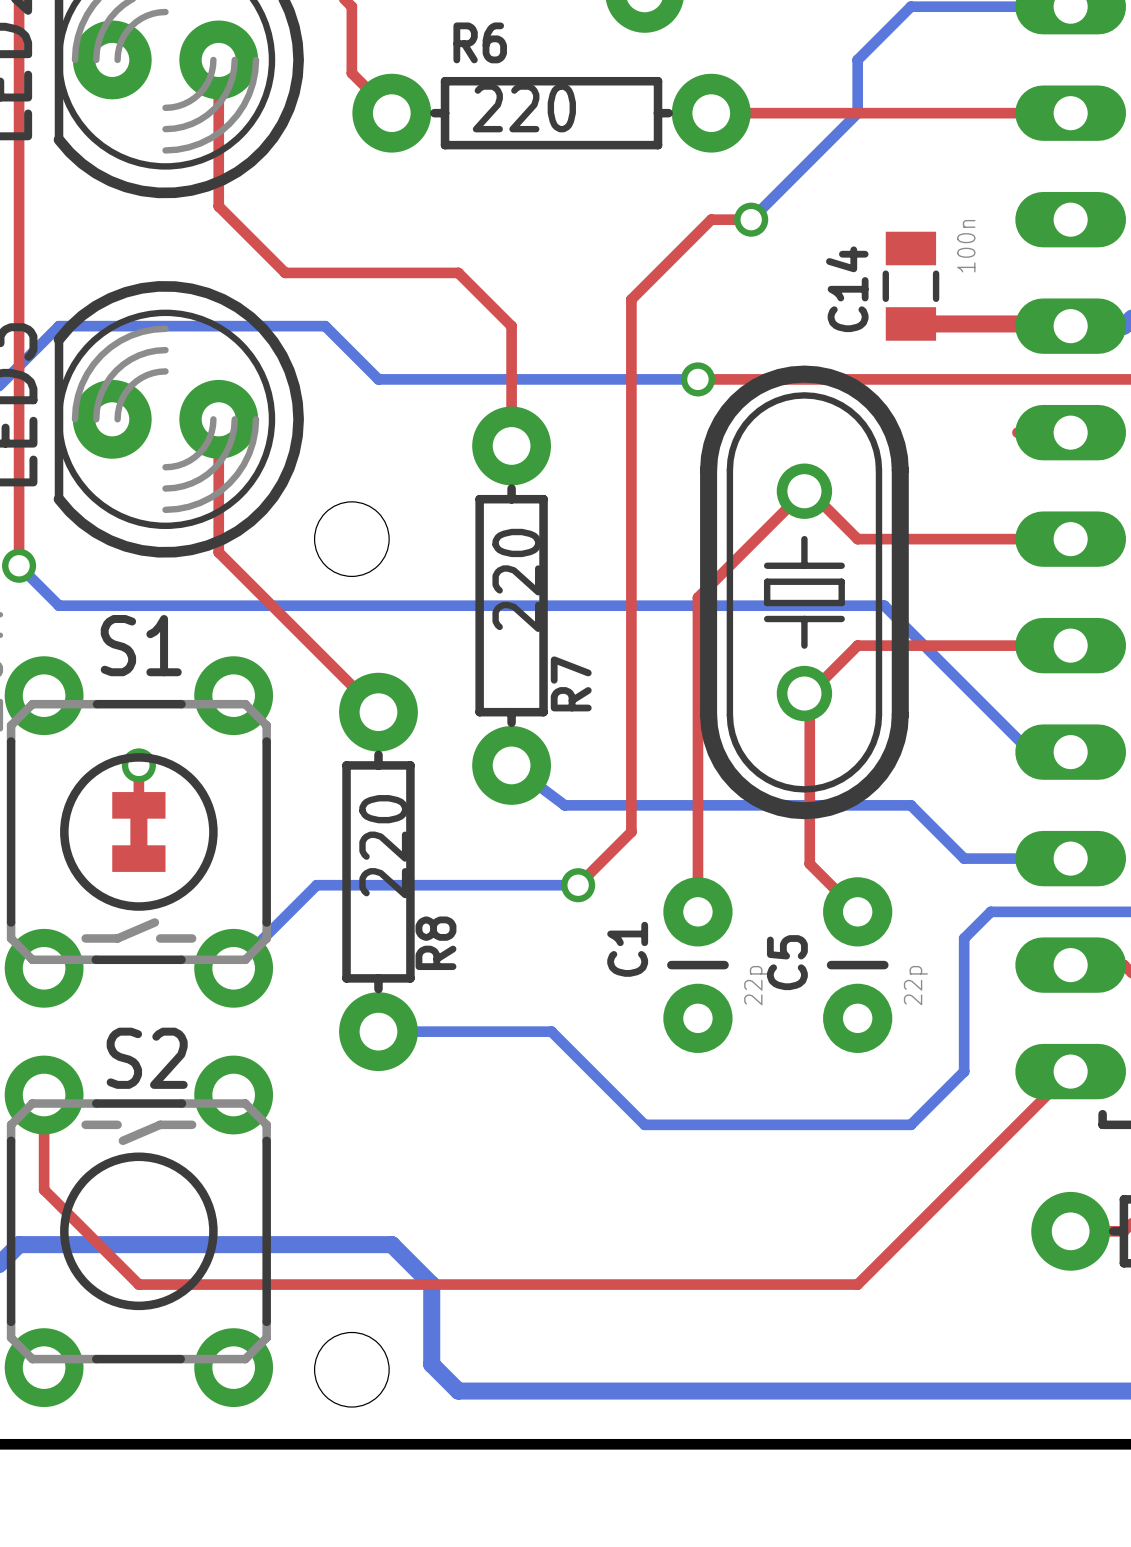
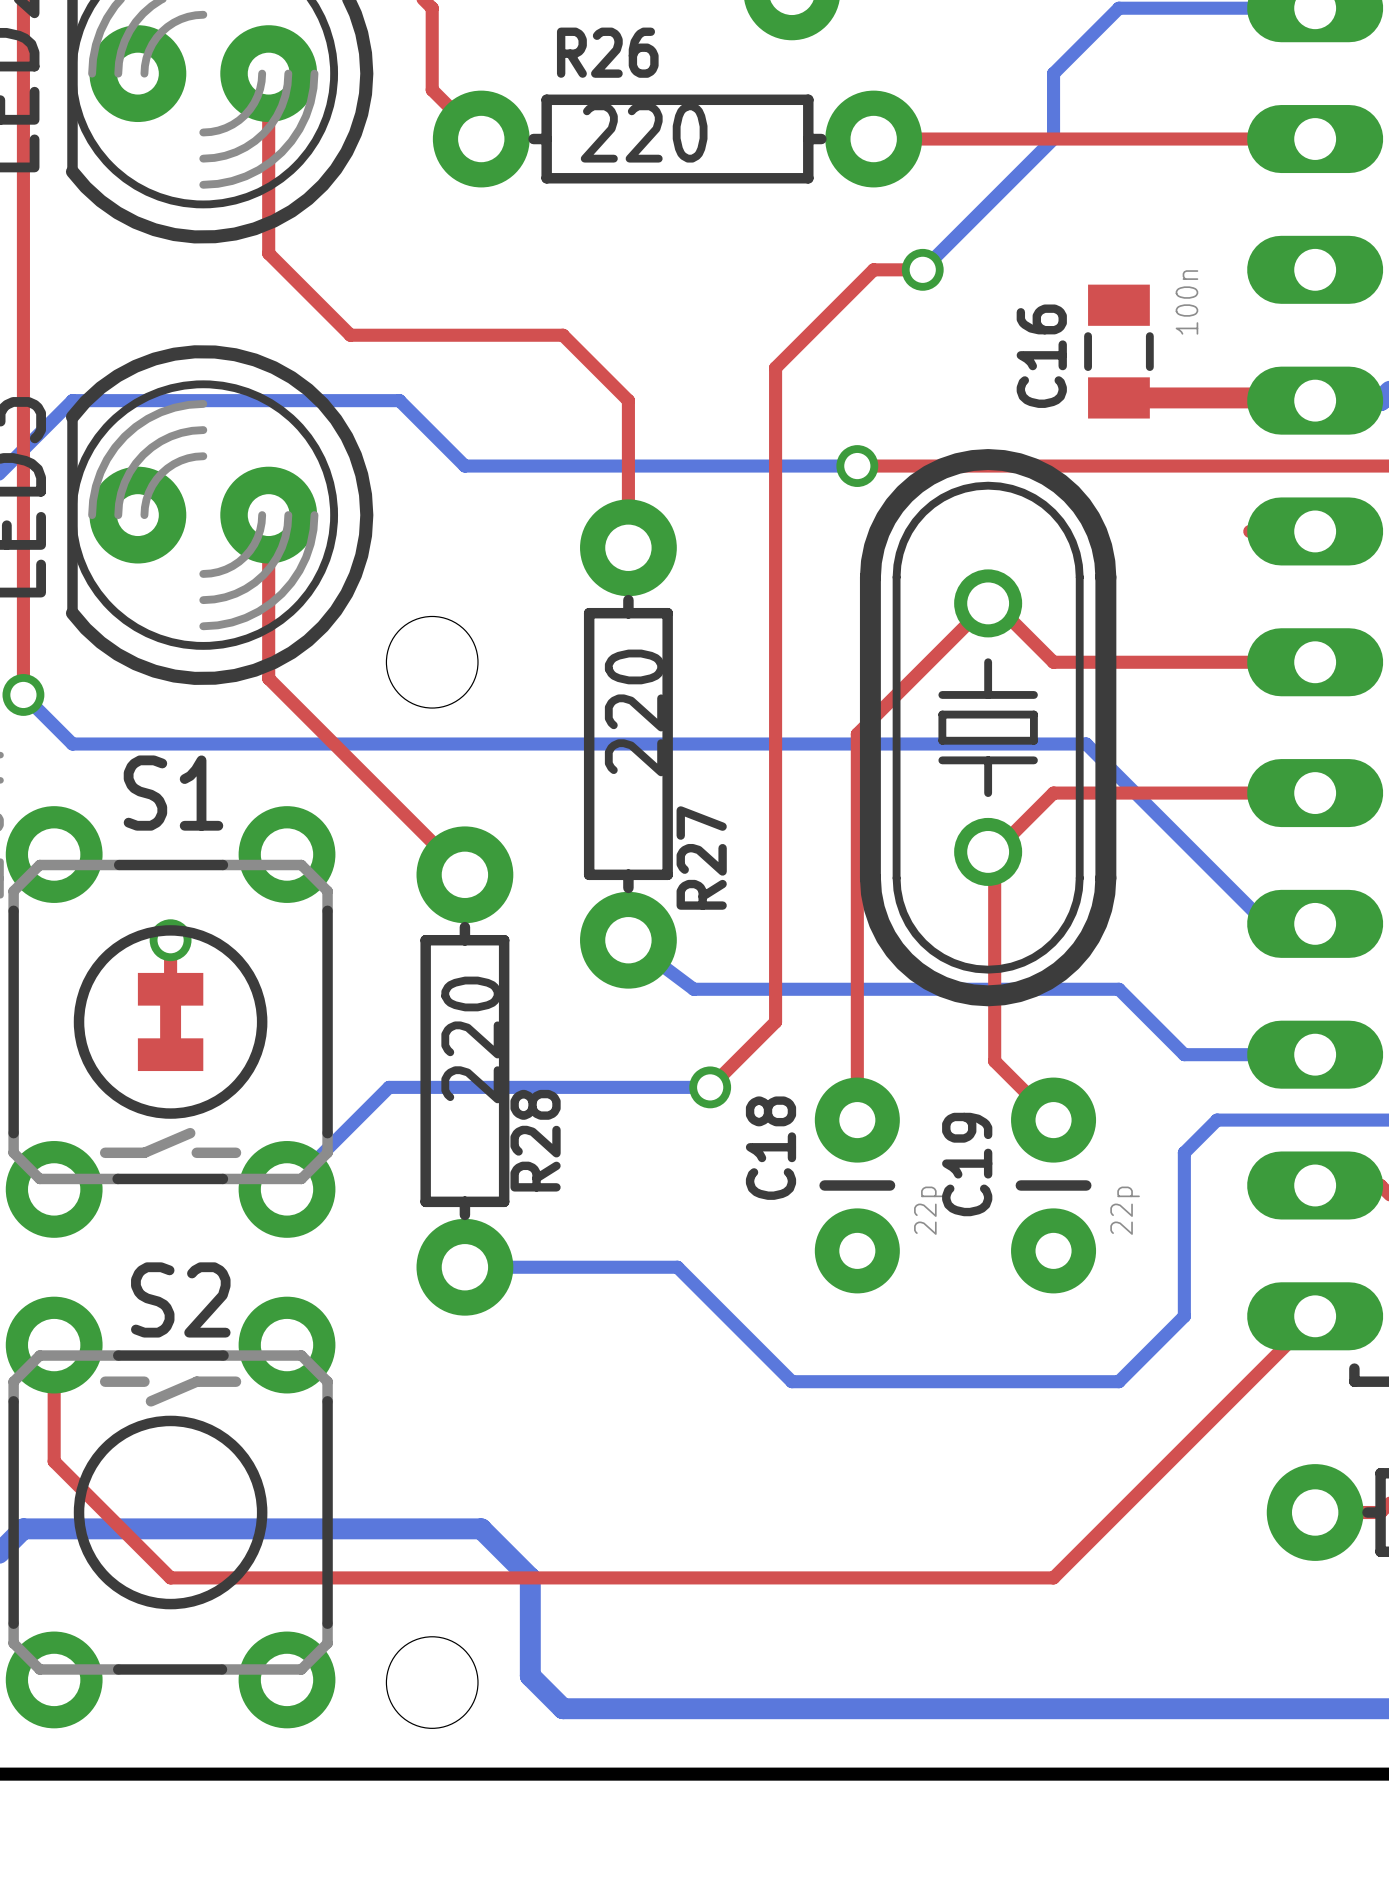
R6 name: R6 (480, 42) -> R26 (607, 52)
C14 name: C14 (847, 289) -> C16 (1041, 356)
R7 name: R7 (571, 683) -> R27 (701, 858)
R8 name: R8 (435, 943) -> R28 (535, 1140)
C1 name: C1 (627, 949) -> C18 (771, 1148)
C5 name: C5 (787, 962) -> C19 (967, 1164)

